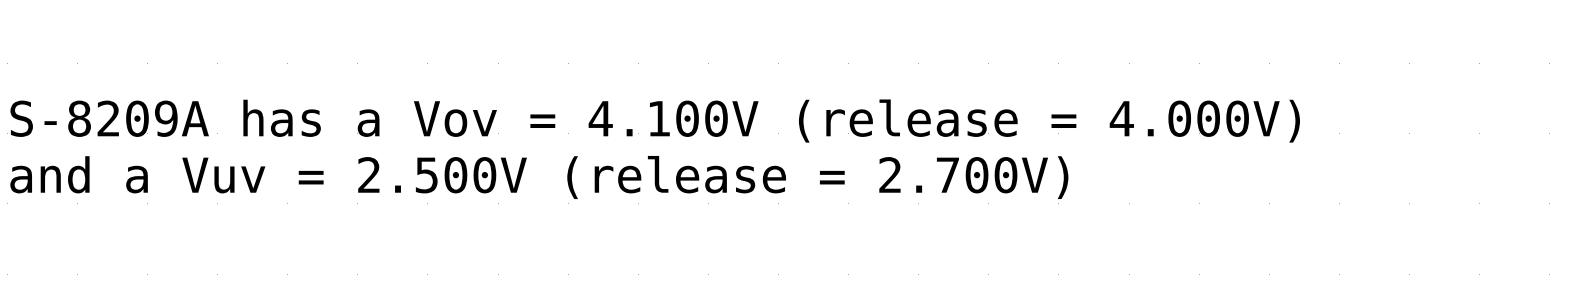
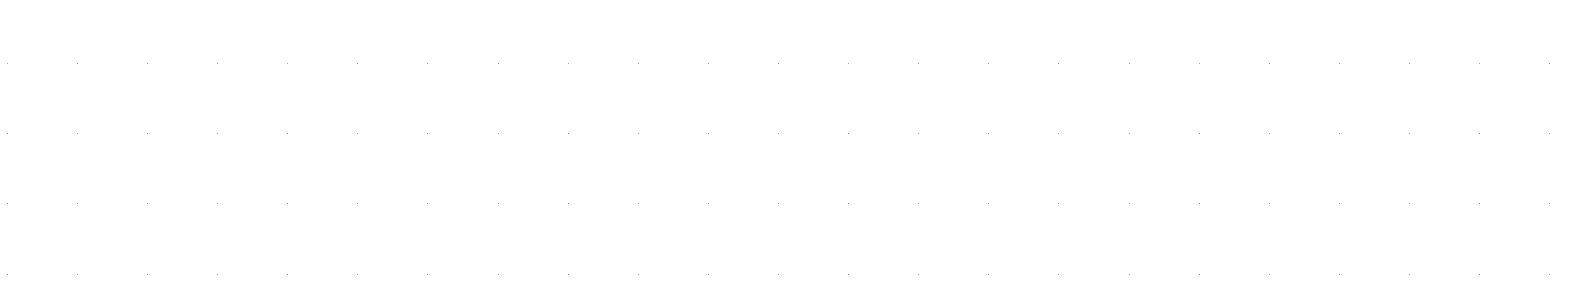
text: S-8209A has a Vov = 4.100V (release = 4.000V) (655, 121) -> none
text: and a Vuv = 2.500V (release = 2.700V) (539, 177) -> none

